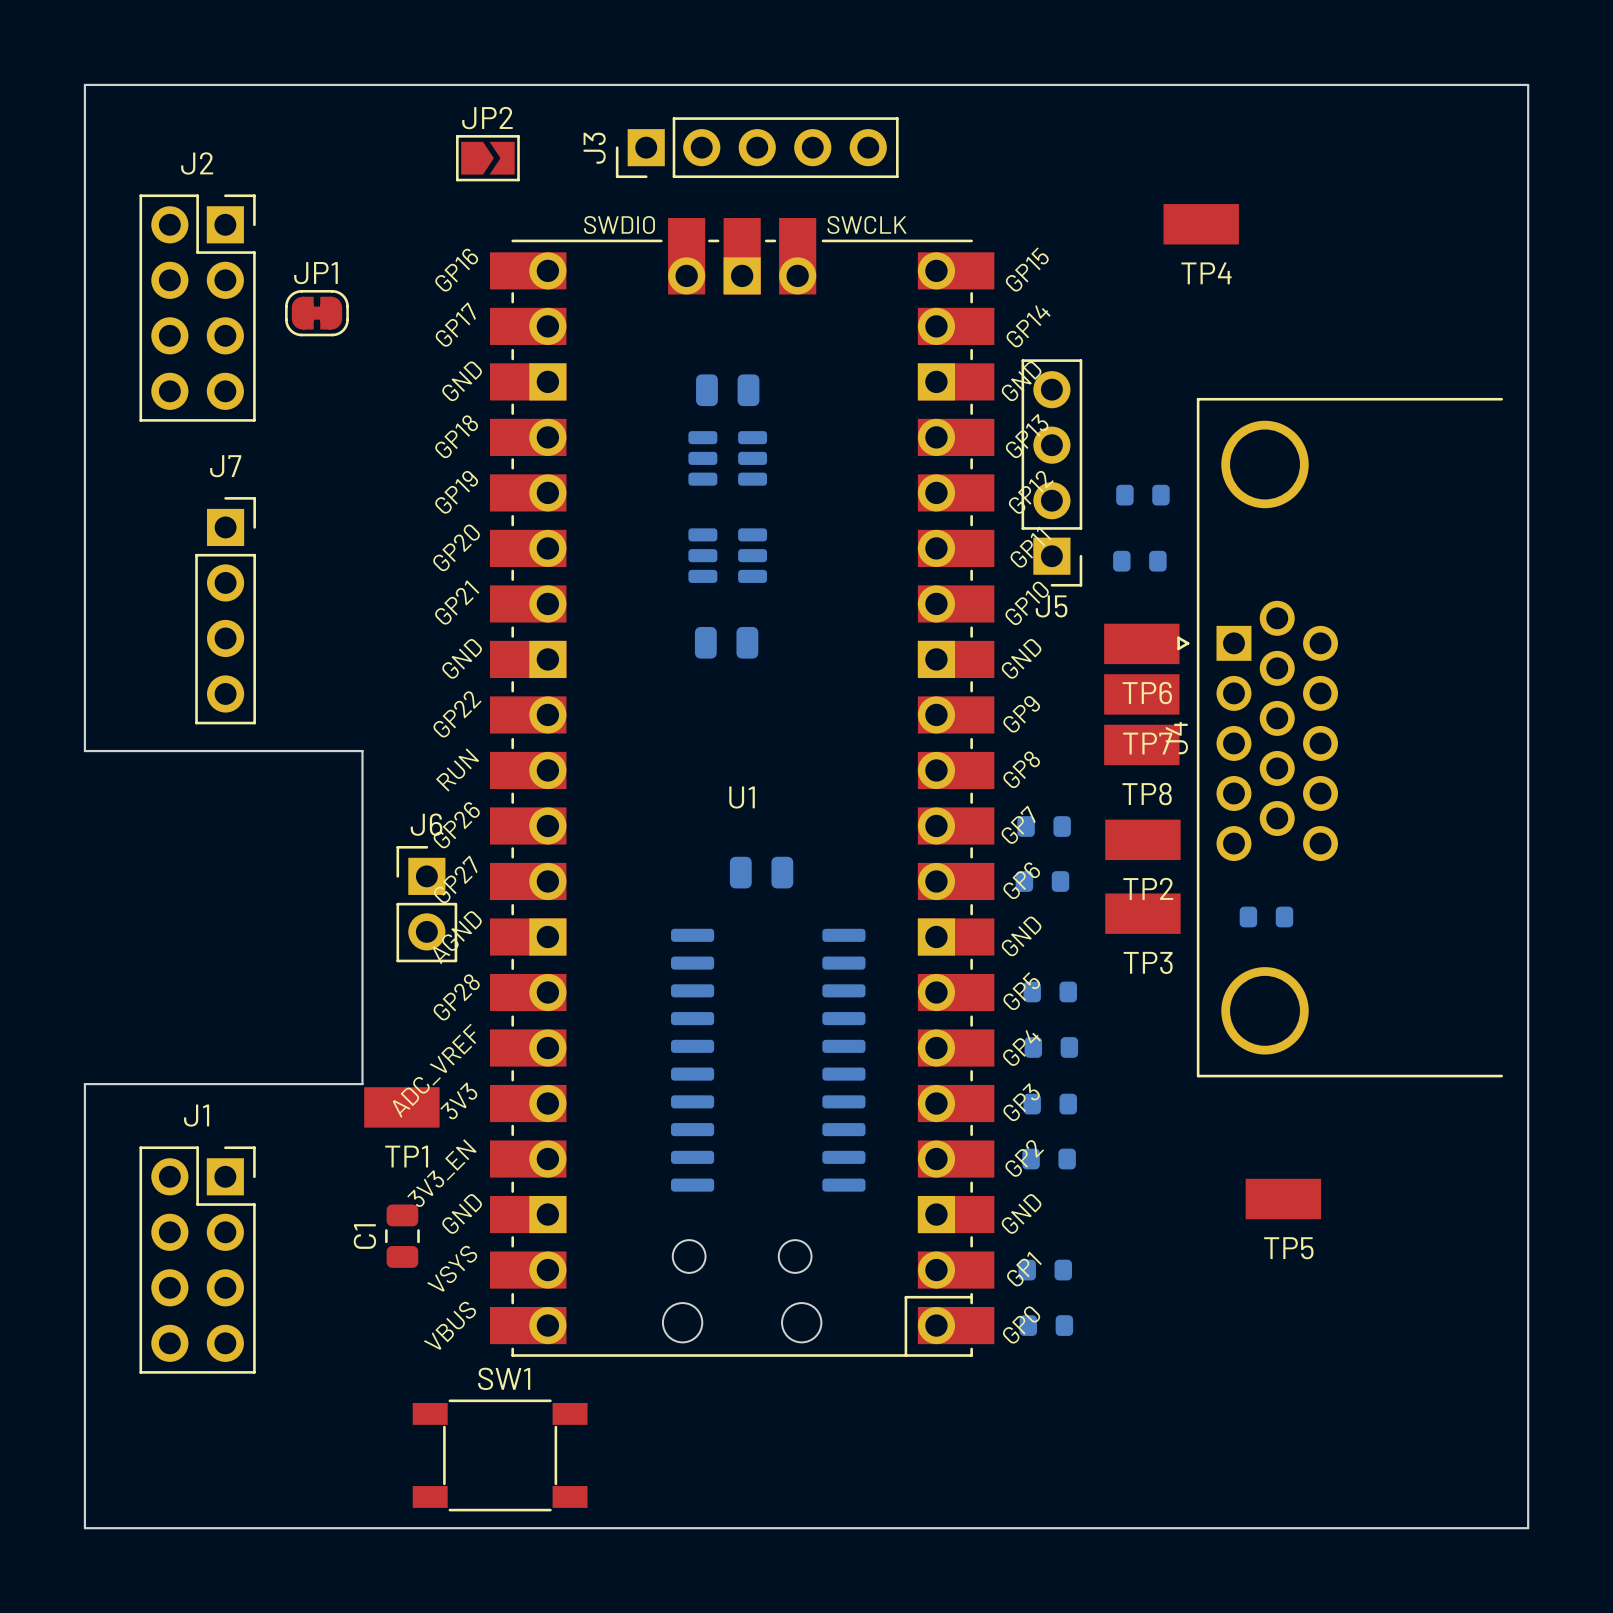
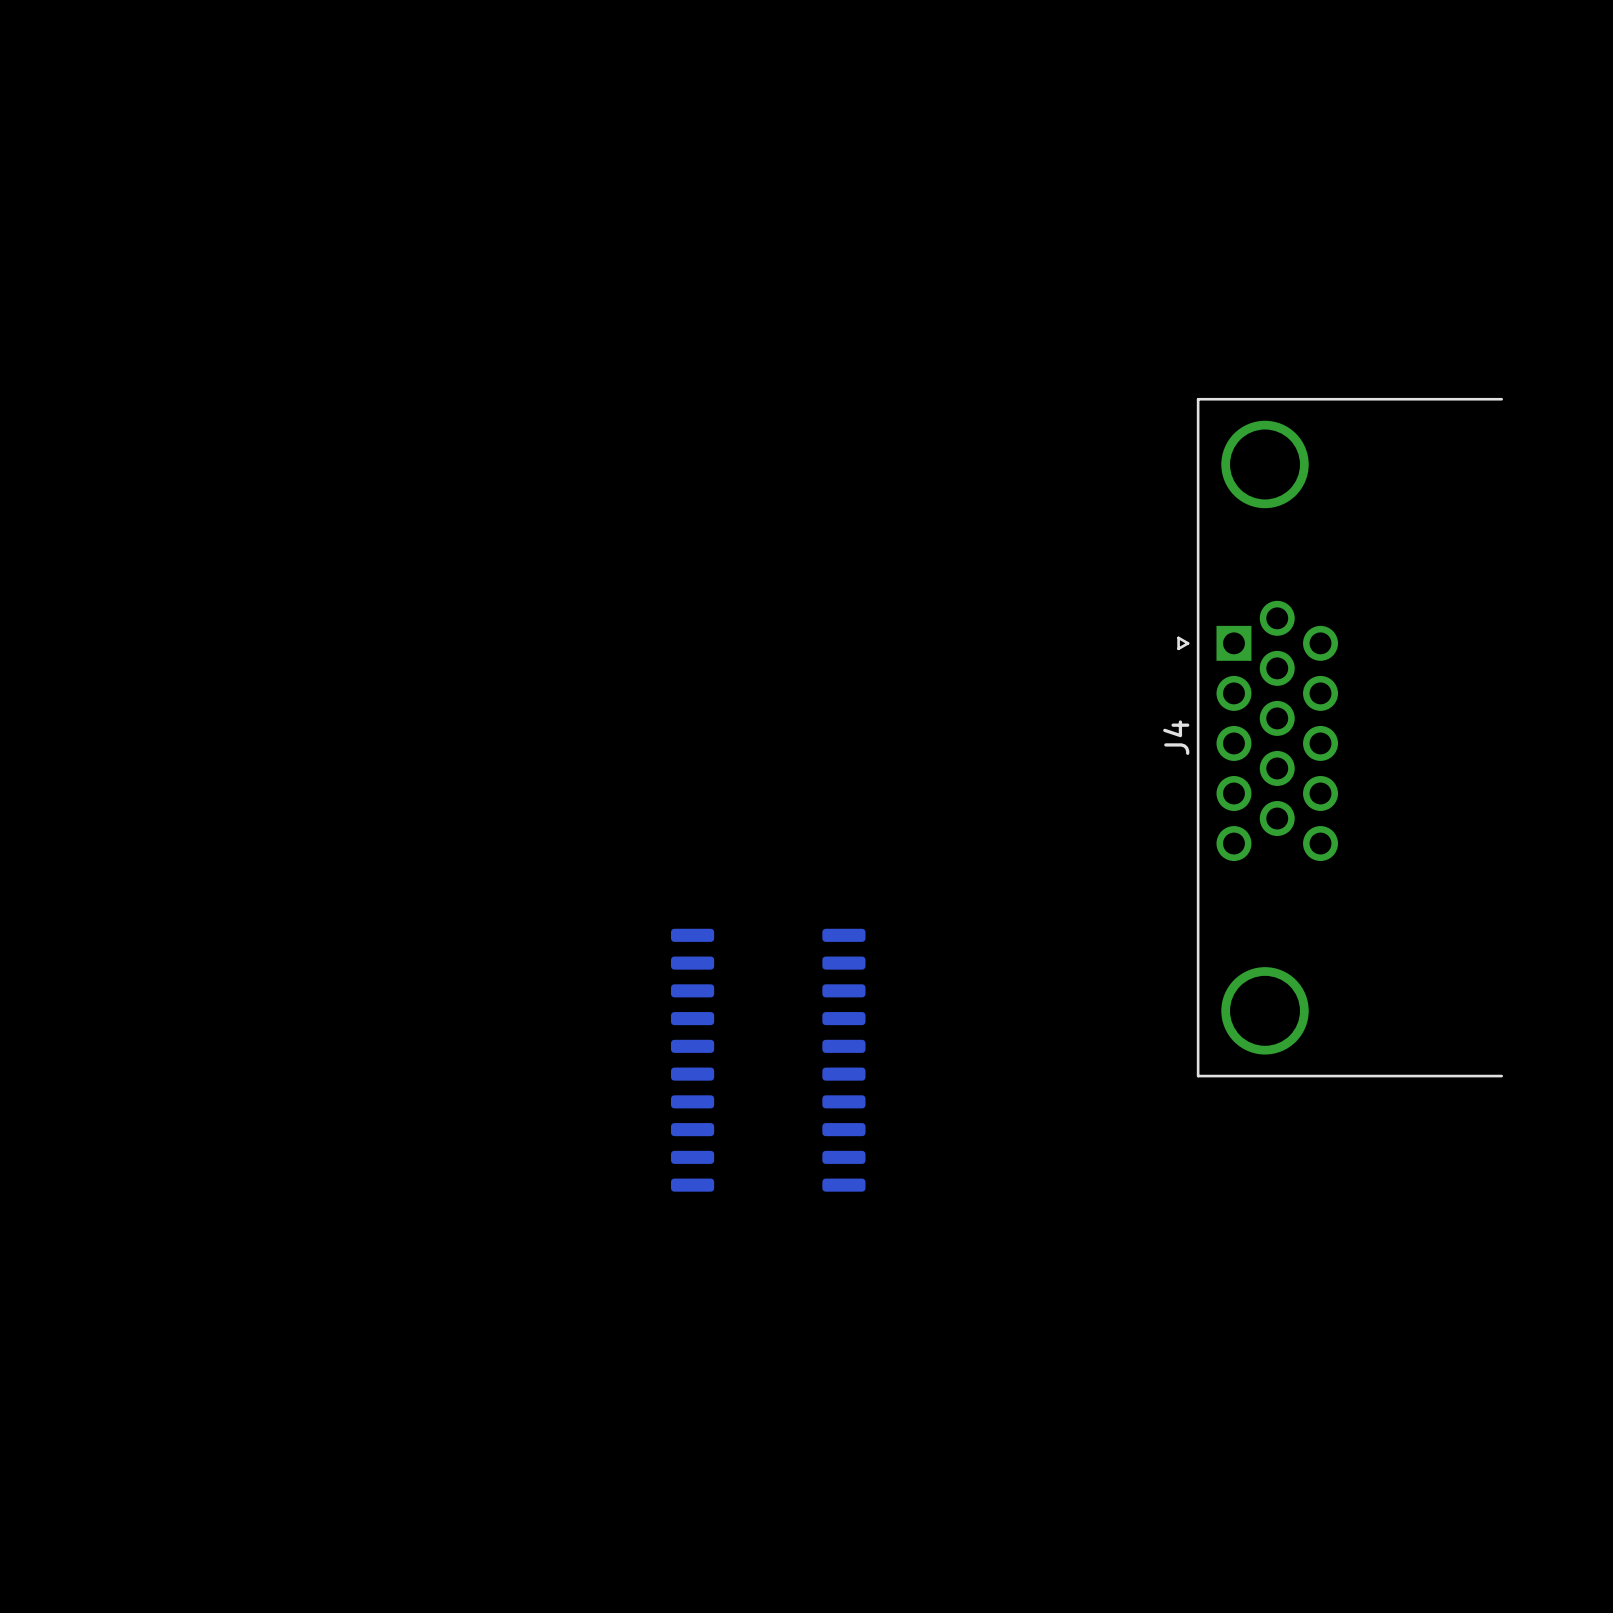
board edge: (84, 84) (84, 751) (362, 751) (362, 1084) (84, 1084) (84, 1528) (1528, 1528) (1528, 84) (84, 84) -> none
J3: (757, 147) -> none
JP2: (487, 158) -> none
TP4: (1201, 224) -> none
J2: (197, 308) -> none
JP1: (316, 313) -> none
part: (727, 390) -> none
part: (727, 458) -> none
J5: (1051, 472) -> none
part: (1142, 495) -> none
part: (727, 555) -> none
part: (1139, 561) -> none
J7: (225, 610) -> none
part: (726, 642) -> none
TP6: (1141, 643) -> none
TP7: (1141, 694) -> none
TP8: (1141, 744) -> none
U1: (742, 787) -> none
part: (1044, 826) -> none
TP2: (1142, 839) -> none
part: (761, 872) -> none
part: (1042, 881) -> none
J6: (426, 904) -> none
TP3: (1142, 913) -> none
part: (1266, 917) -> none
part: (1050, 991) -> none
part: (1051, 1047) -> none
part: (1050, 1104) -> none
TP1: (401, 1107) -> none
part: (1049, 1159) -> none
TP5: (1283, 1199) -> none
C1: (402, 1236) -> none
J1: (197, 1260) -> none
part: (1045, 1270) -> none
part: (1046, 1325) -> none
SW1: (500, 1455) -> none

